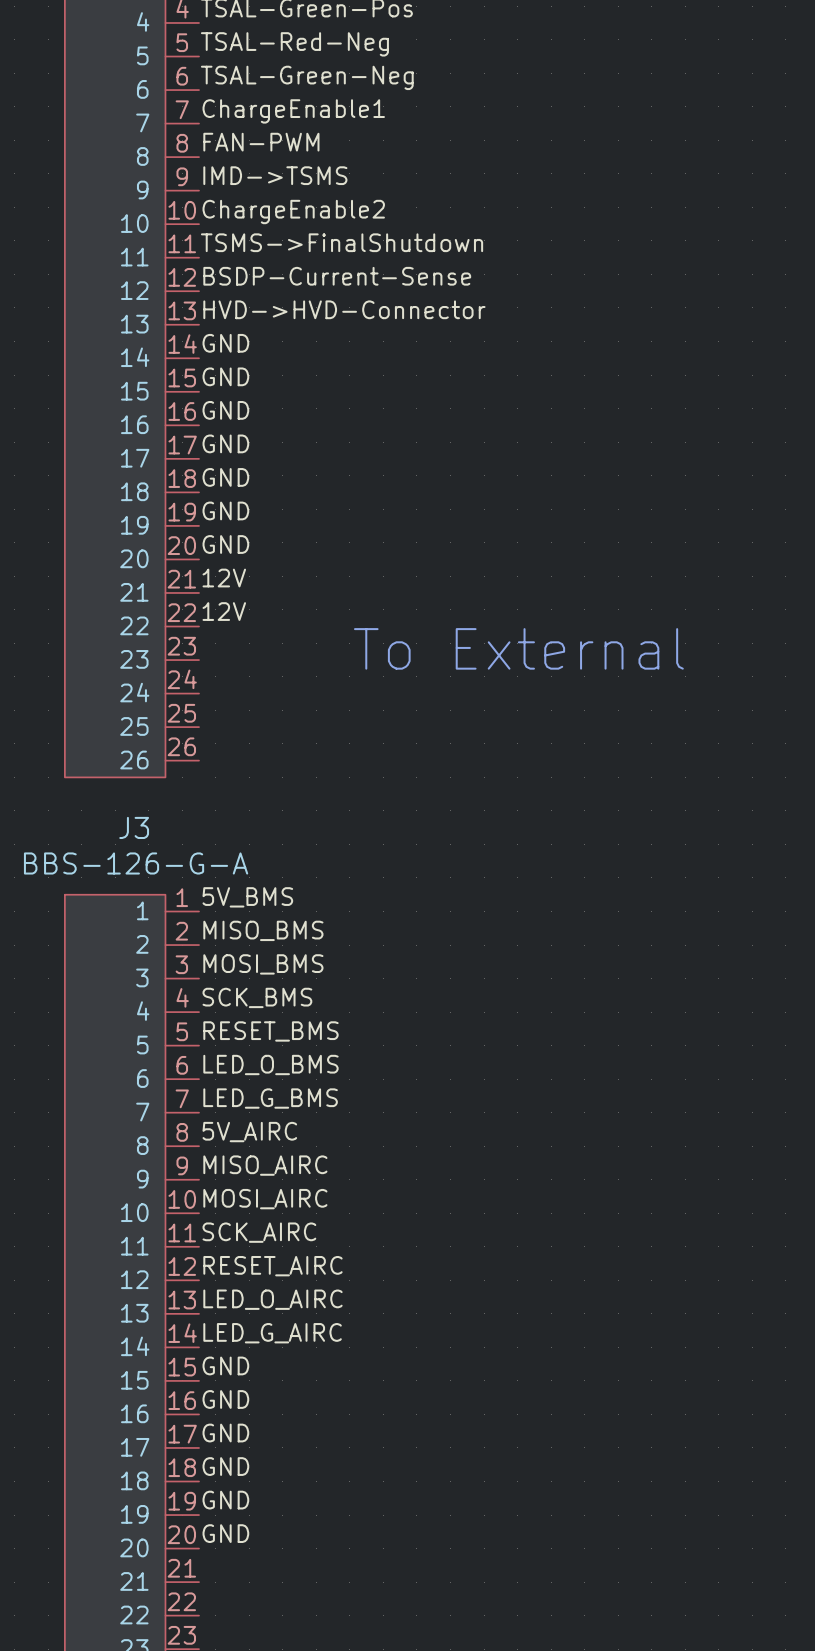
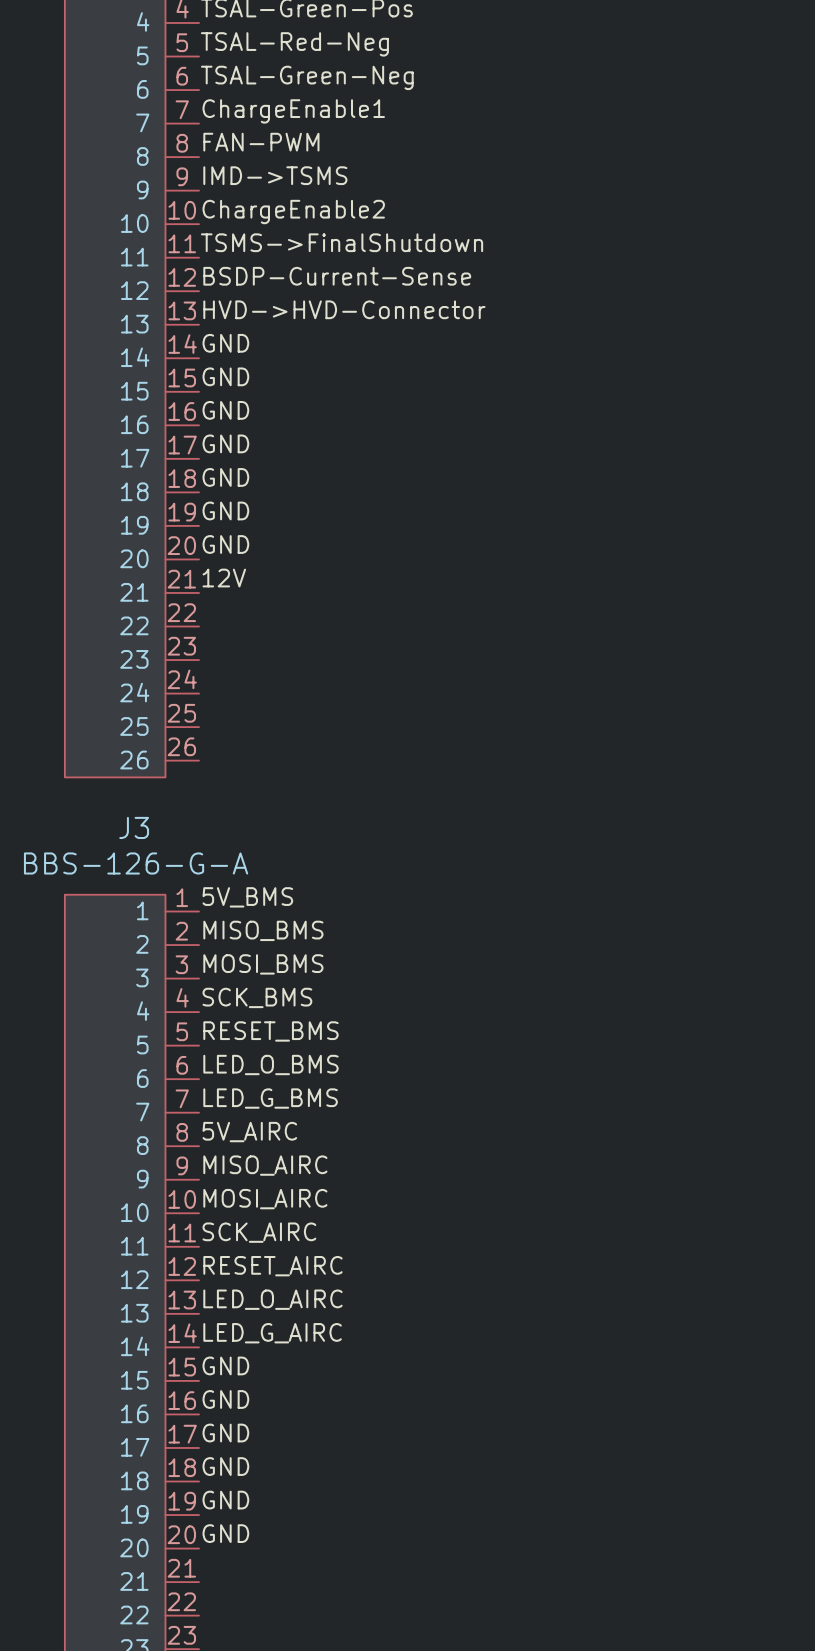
label: 12V (224, 611) -> none
text: To External (518, 648) -> none

